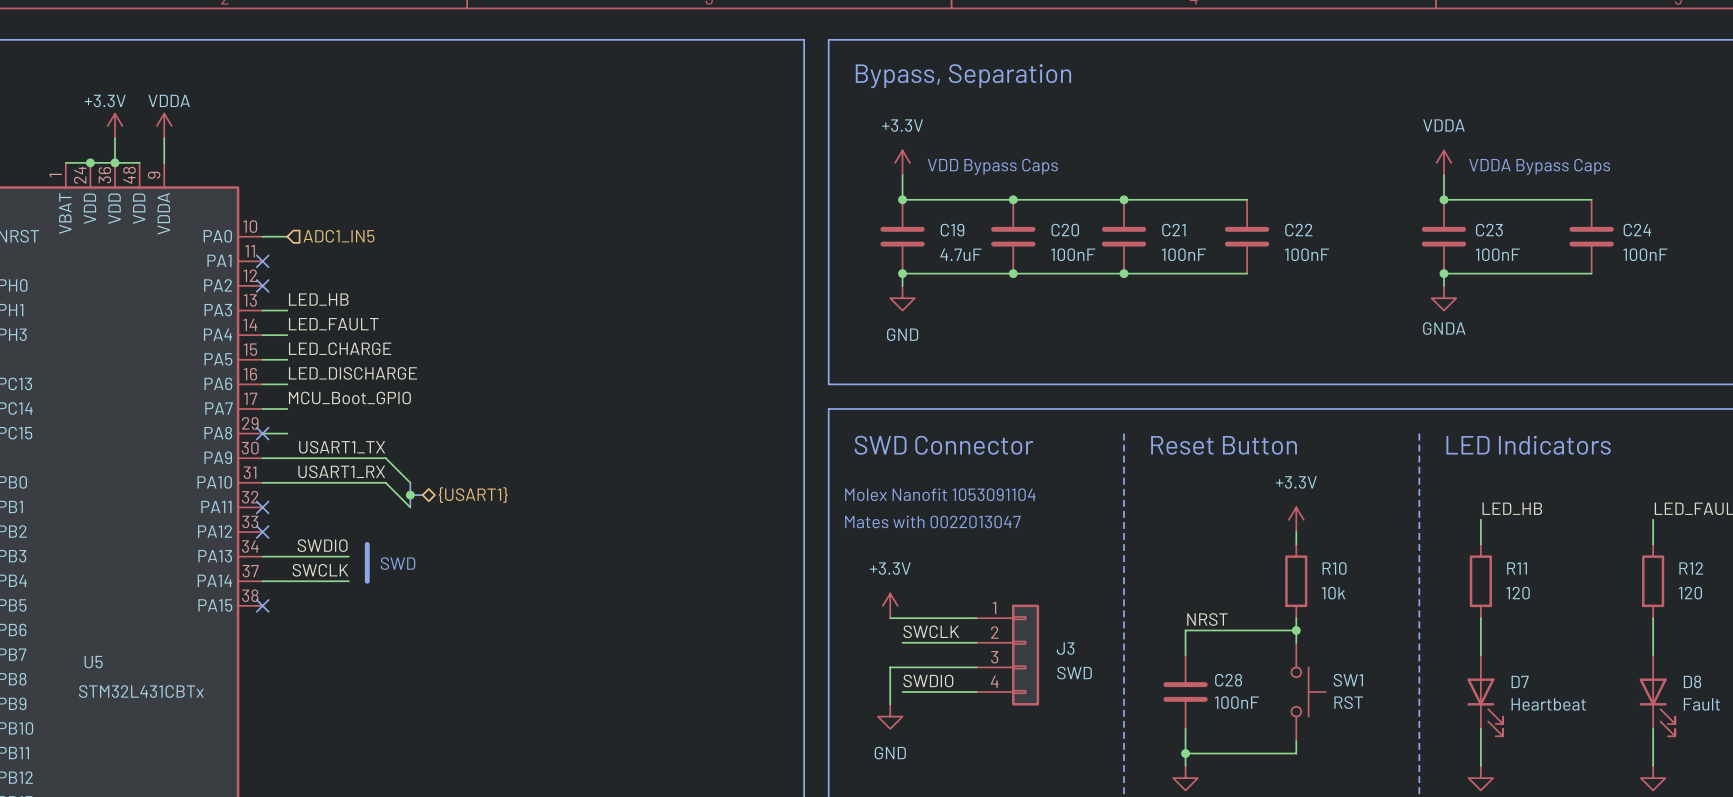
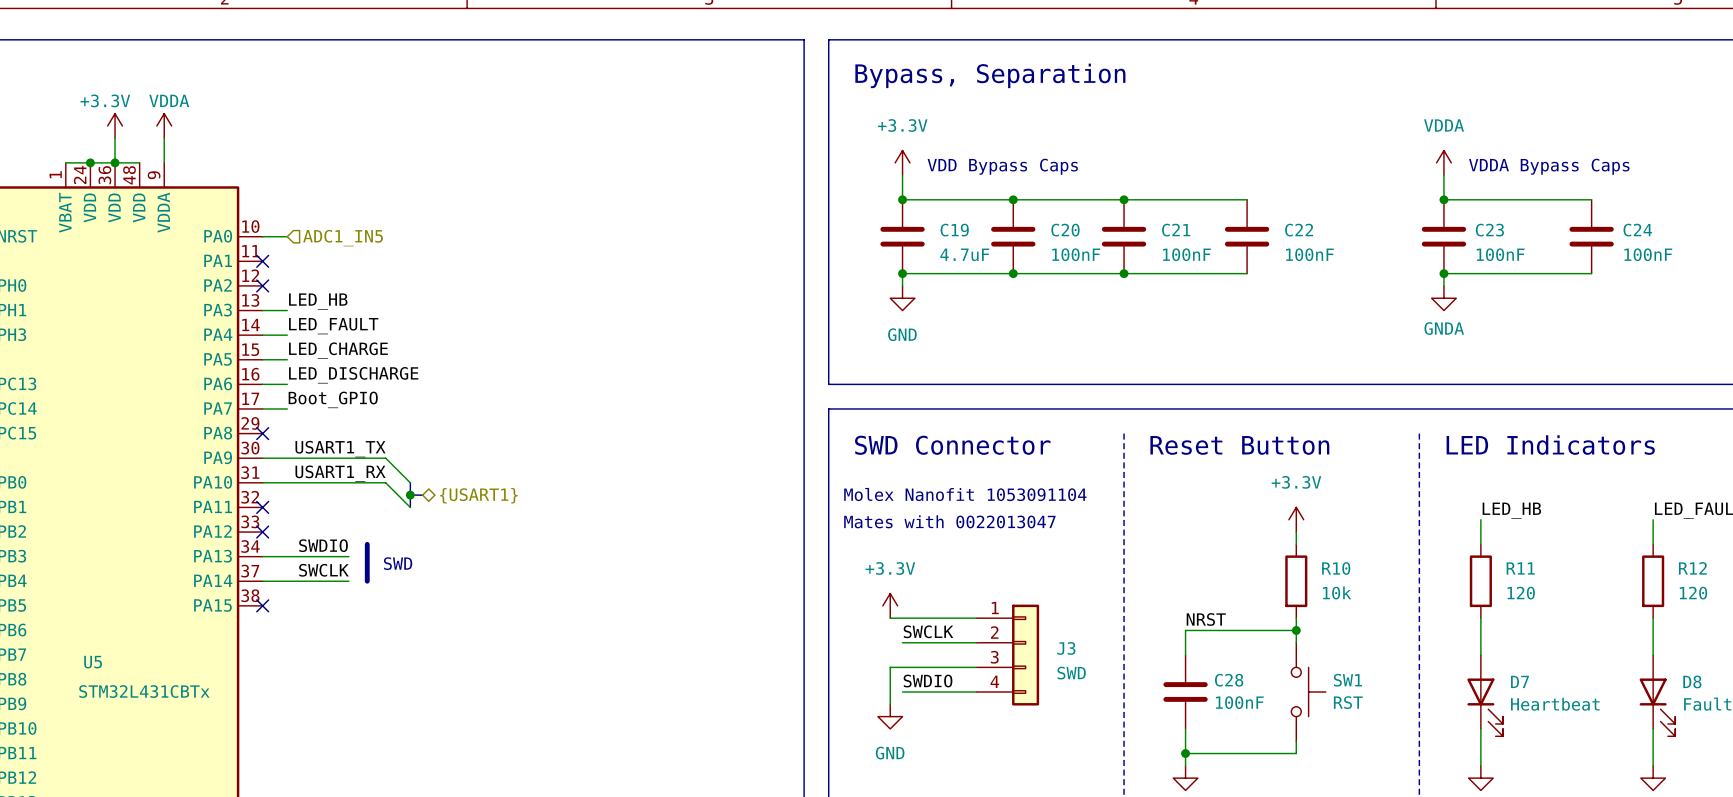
label: MCU_Boot_GPIO (349, 398) -> Boot_GPIO (333, 399)
wire: (262, 433) (287, 433) -> none

